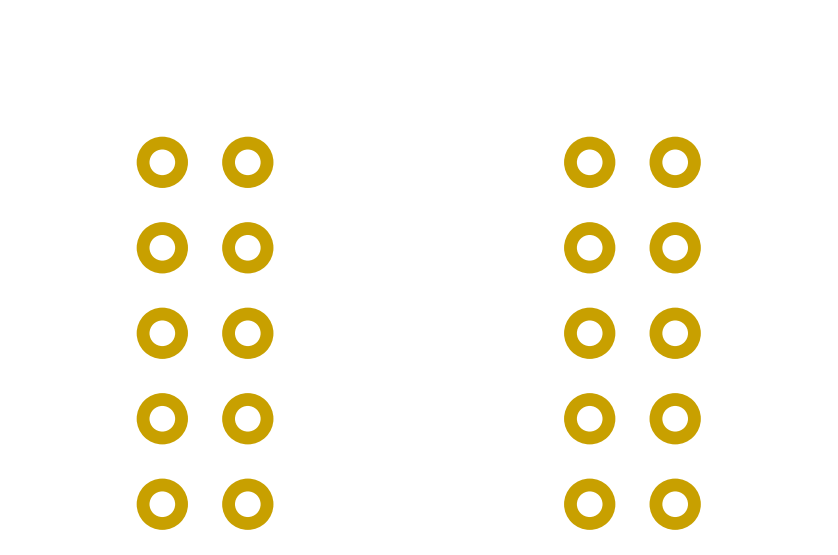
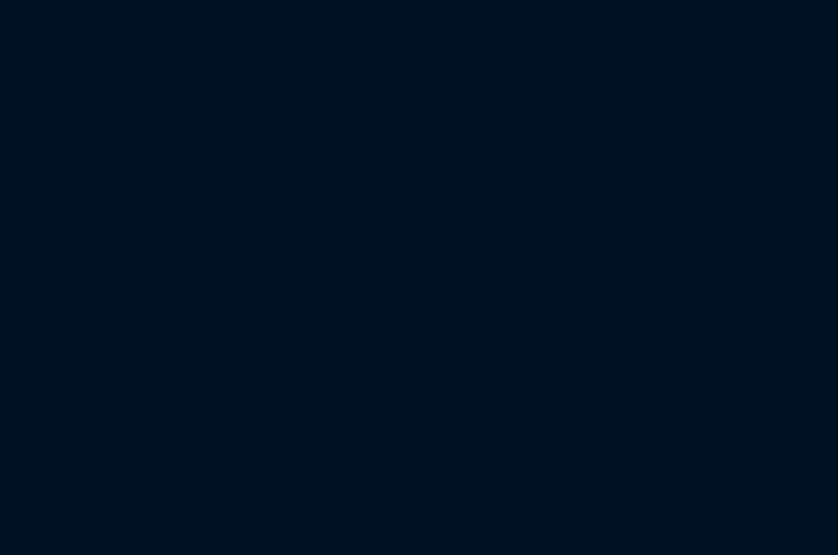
part: (205, 162) -> none
part: (632, 162) -> none
part: (205, 247) -> none
part: (632, 247) -> none
part: (205, 333) -> none
part: (632, 333) -> none
part: (205, 418) -> none
part: (632, 418) -> none
part: (205, 504) -> none
part: (632, 504) -> none

